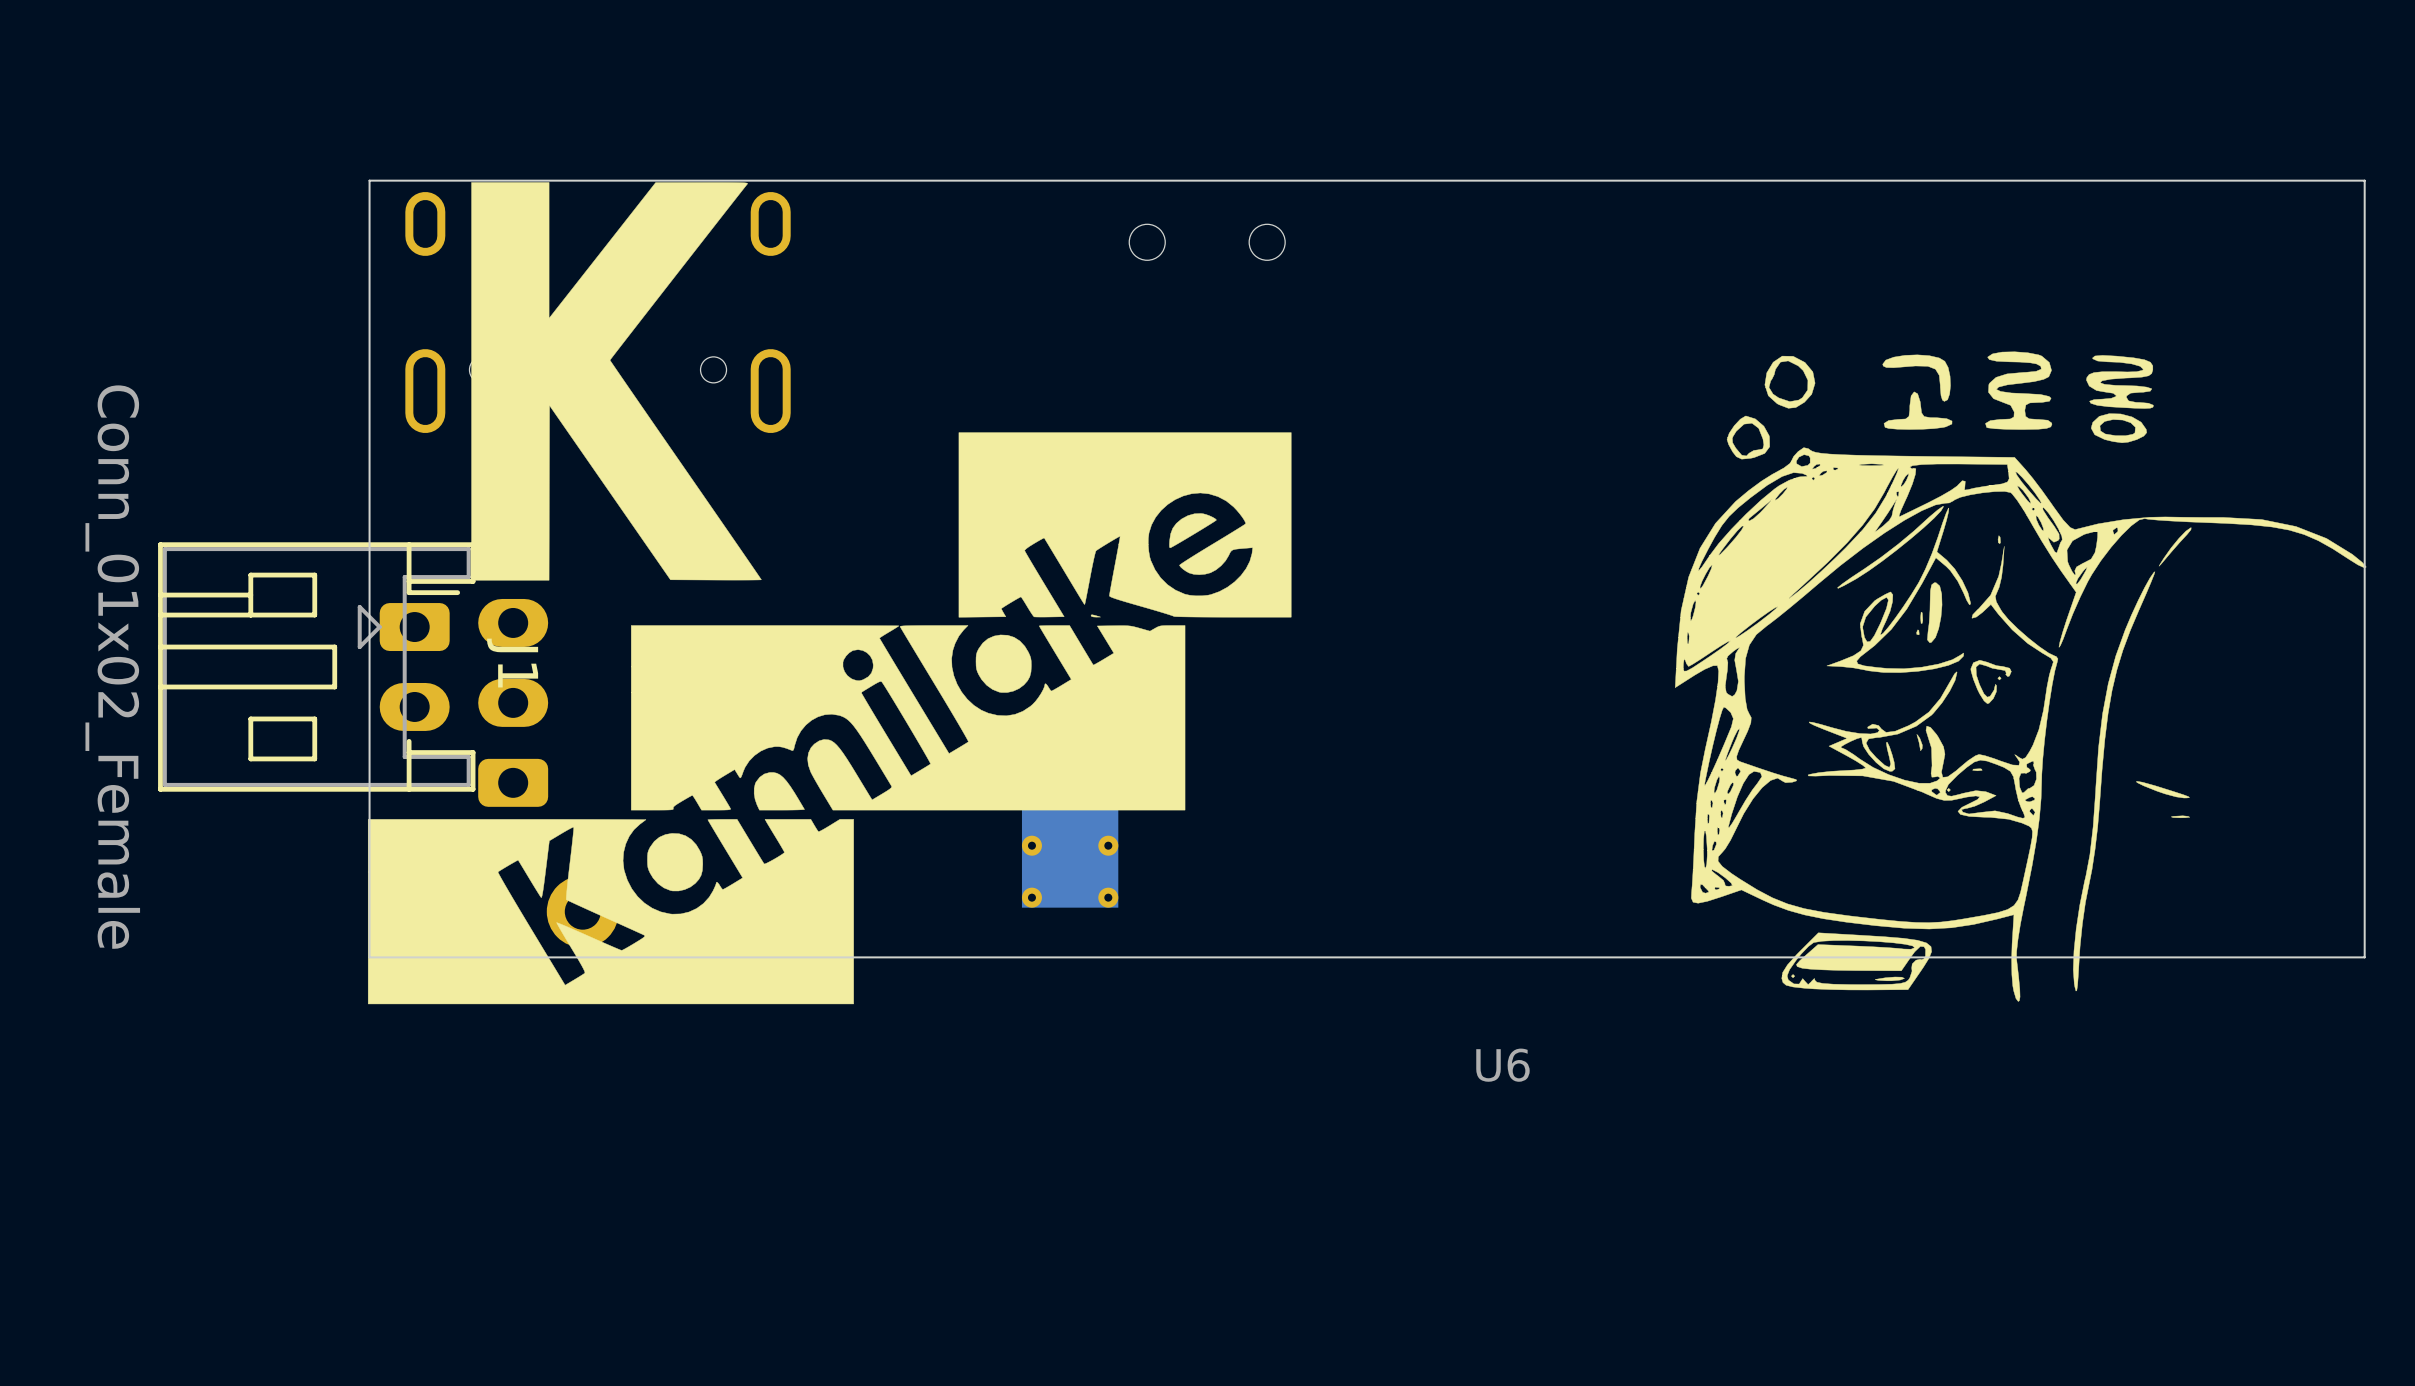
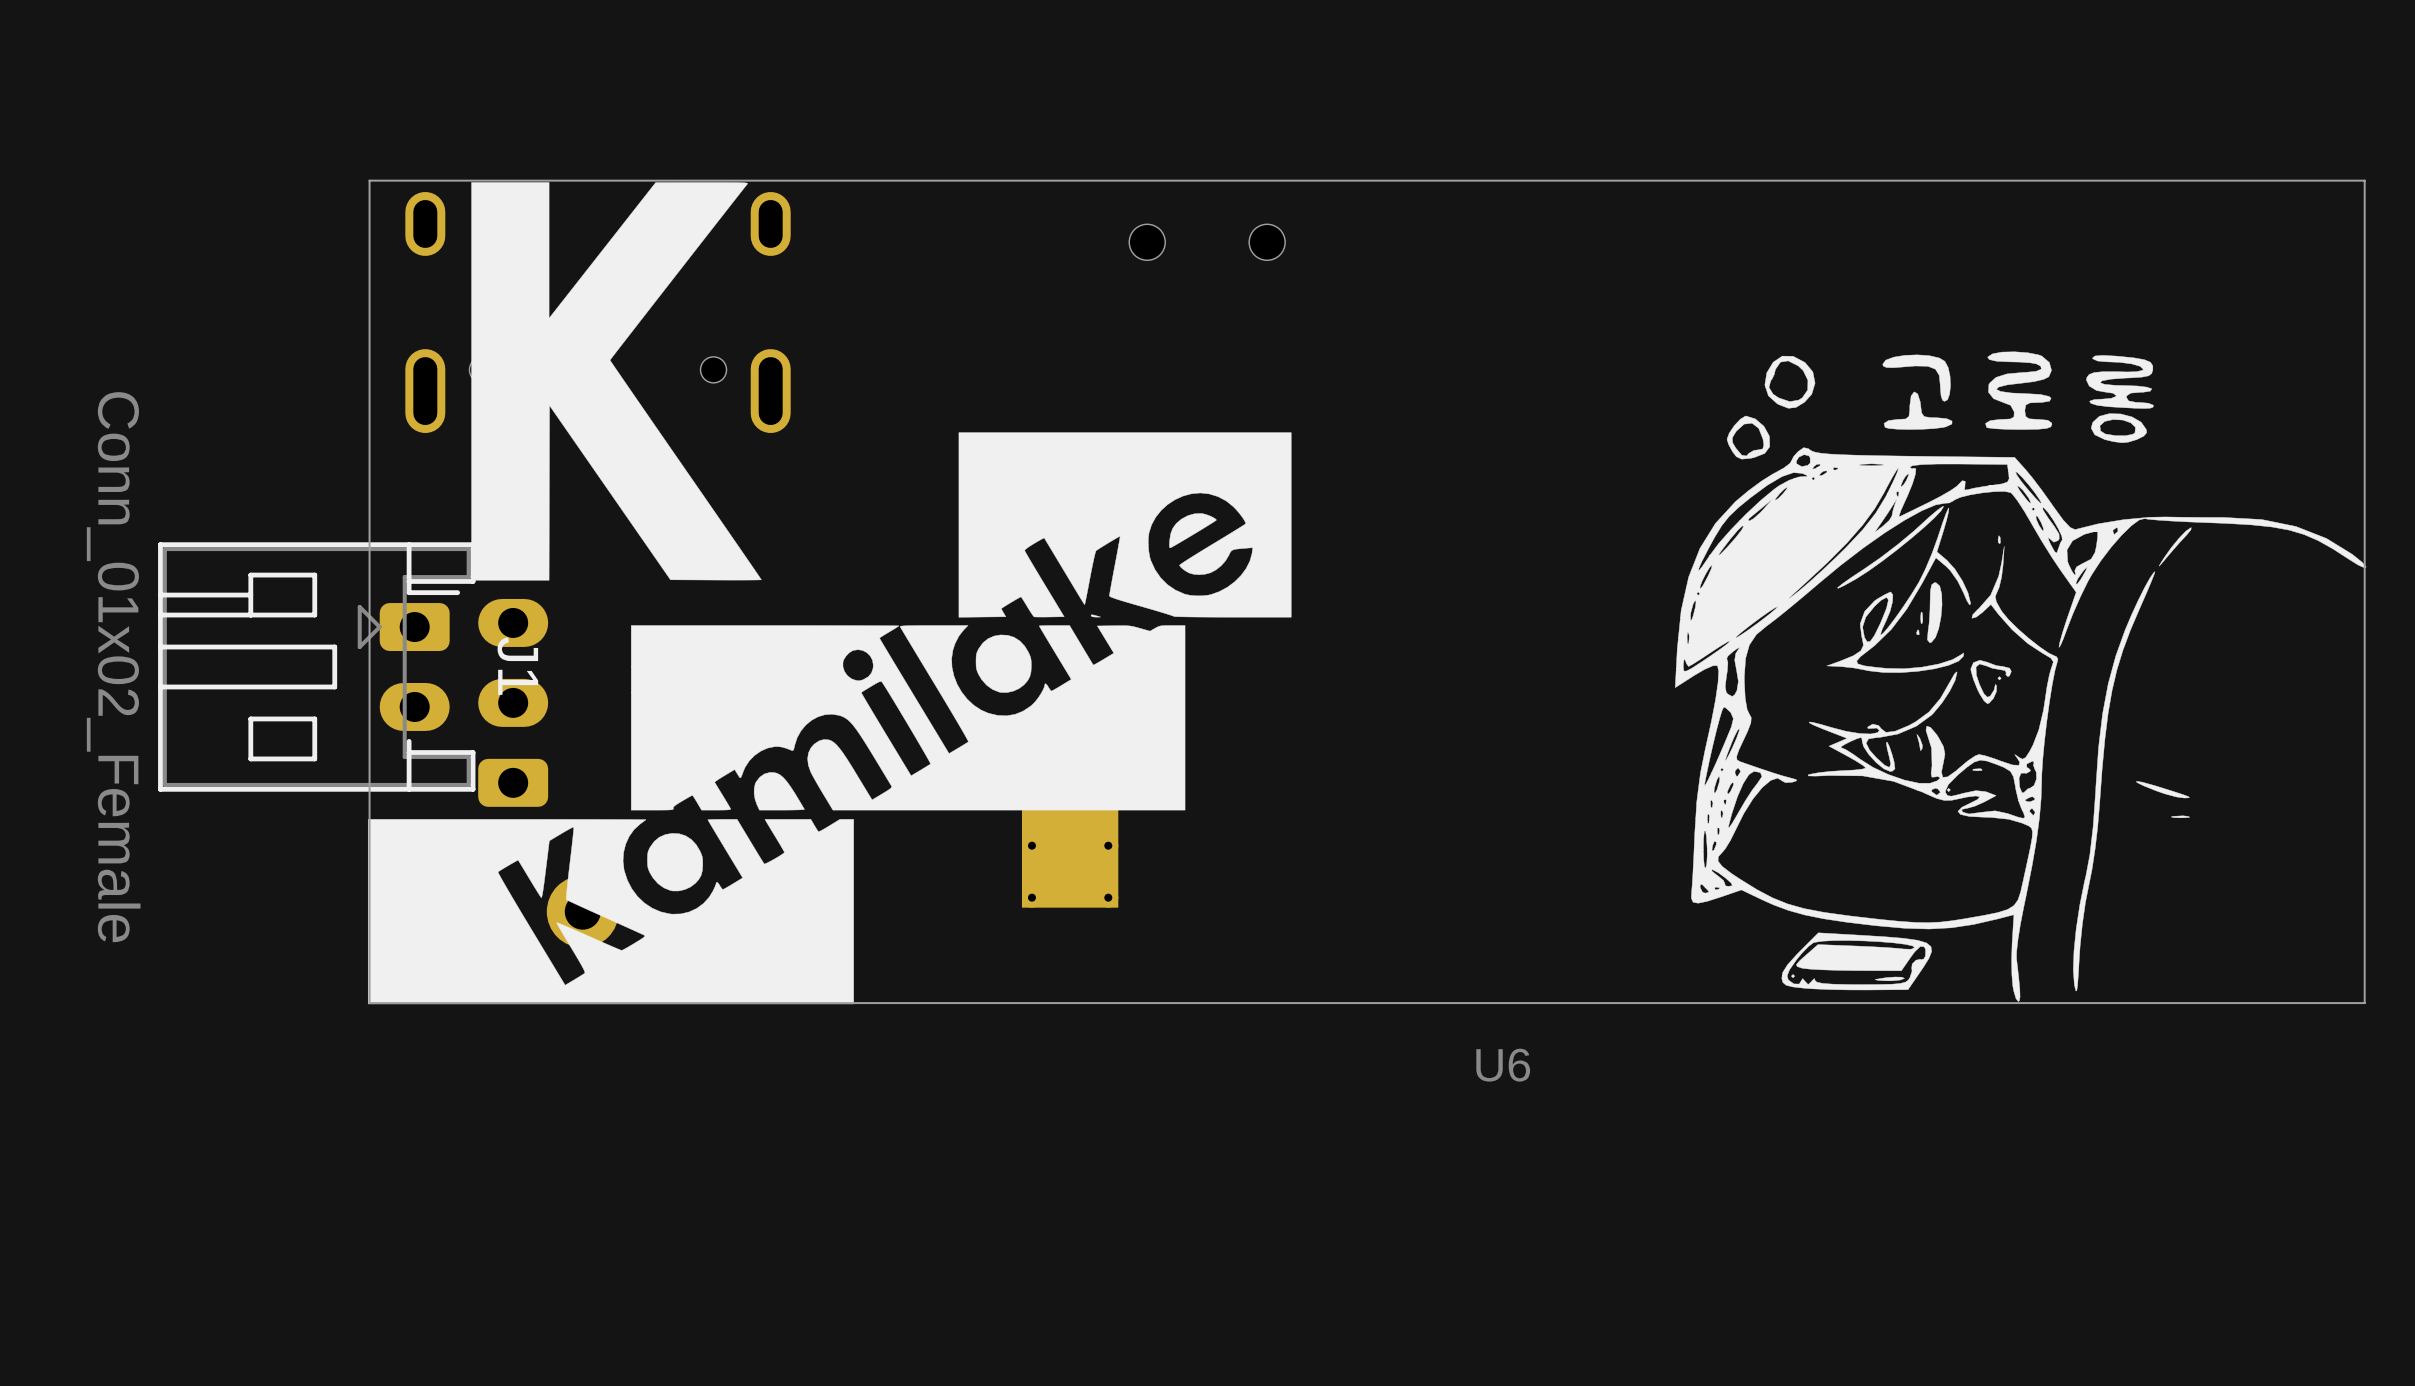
board edge: (2364, 957) (369, 957) -> (2364, 957) (2364, 1003) (369, 1003) (369, 957)

